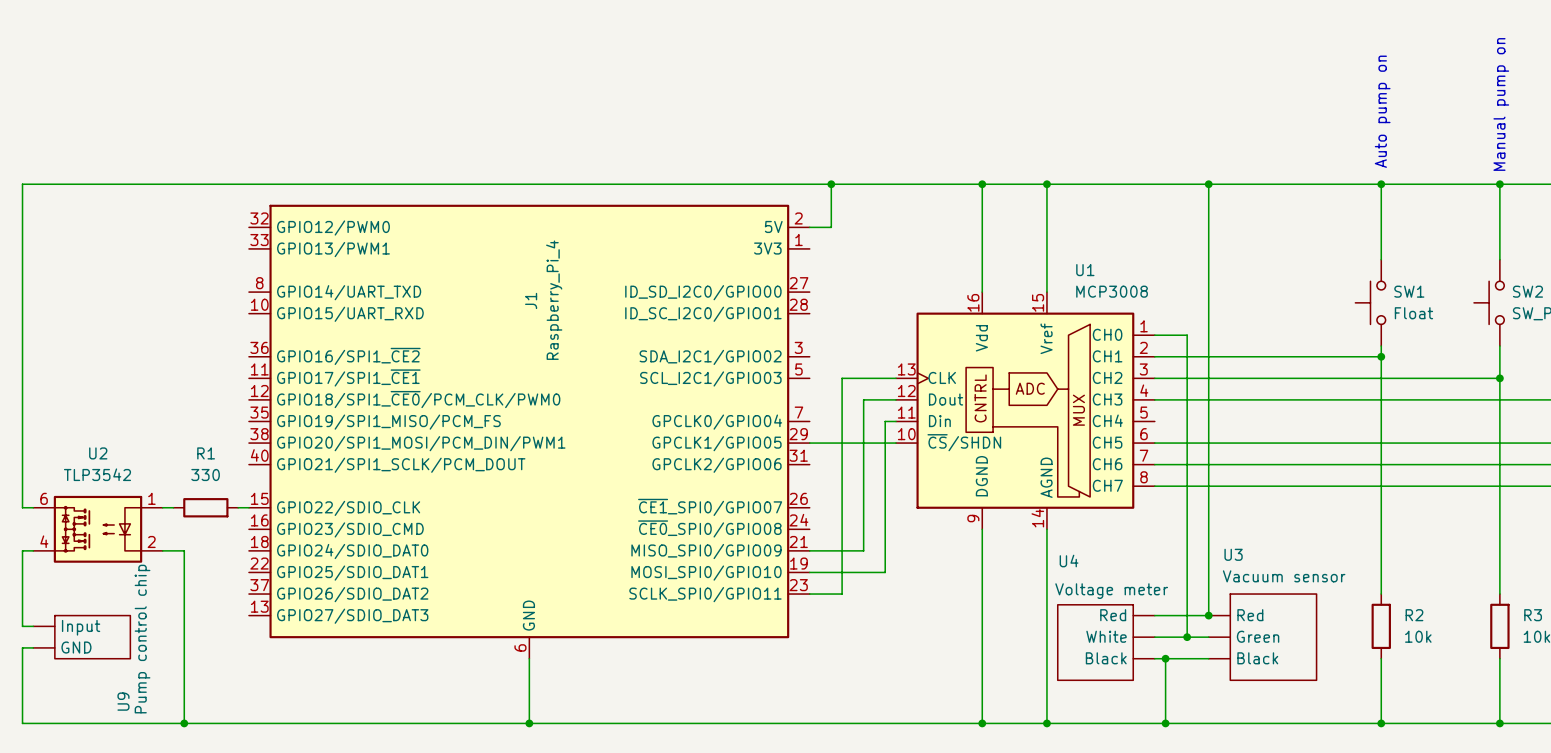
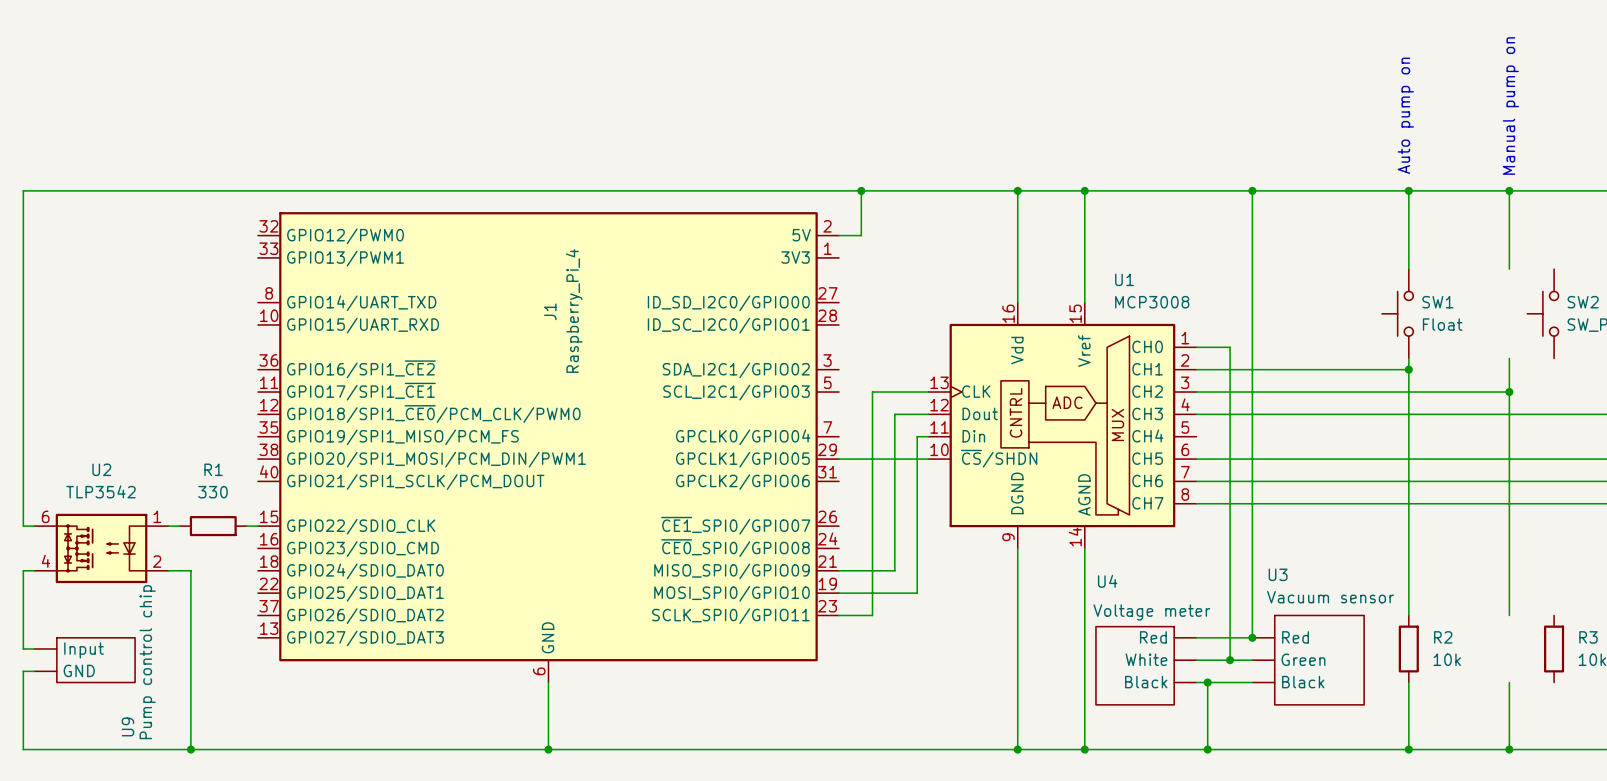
text position: Manual pump on (1501, 104) -> Manual pump on (1510, 106)
text position: Auto pump on (1382, 111) -> Auto pump on (1405, 115)
wire: (1381, 184) (1381, 259) -> (1408, 190) (1408, 269)
junction position: (1381, 184) -> (1408, 190)
junction: none -> (1509, 190)
wire: (1499, 184) (1499, 259) -> (1509, 190) (1509, 269)
junction: (1499, 184) -> none
SW1 position: (1370, 302) -> (1397, 313)
wire: (1381, 345) (1381, 594) -> (1408, 358) (1408, 615)
wire: (1499, 345) (1499, 594) -> (1509, 358) (1509, 615)
wire: (1359, 356) (1381, 356) -> none
junction position: (1381, 356) -> (1408, 369)
wire: (1456, 378) (1499, 378) -> none
junction: none -> (1509, 392)
junction: (1499, 378) -> none
R2 position: (1381, 626) -> (1408, 649)
wire: (1381, 658) (1381, 723) -> (1408, 682) (1408, 749)
wire: (1499, 658) (1499, 723) -> (1509, 682) (1509, 749)
junction position: (1381, 723) -> (1408, 749)
junction: none -> (1509, 749)
junction: (1499, 723) -> none

